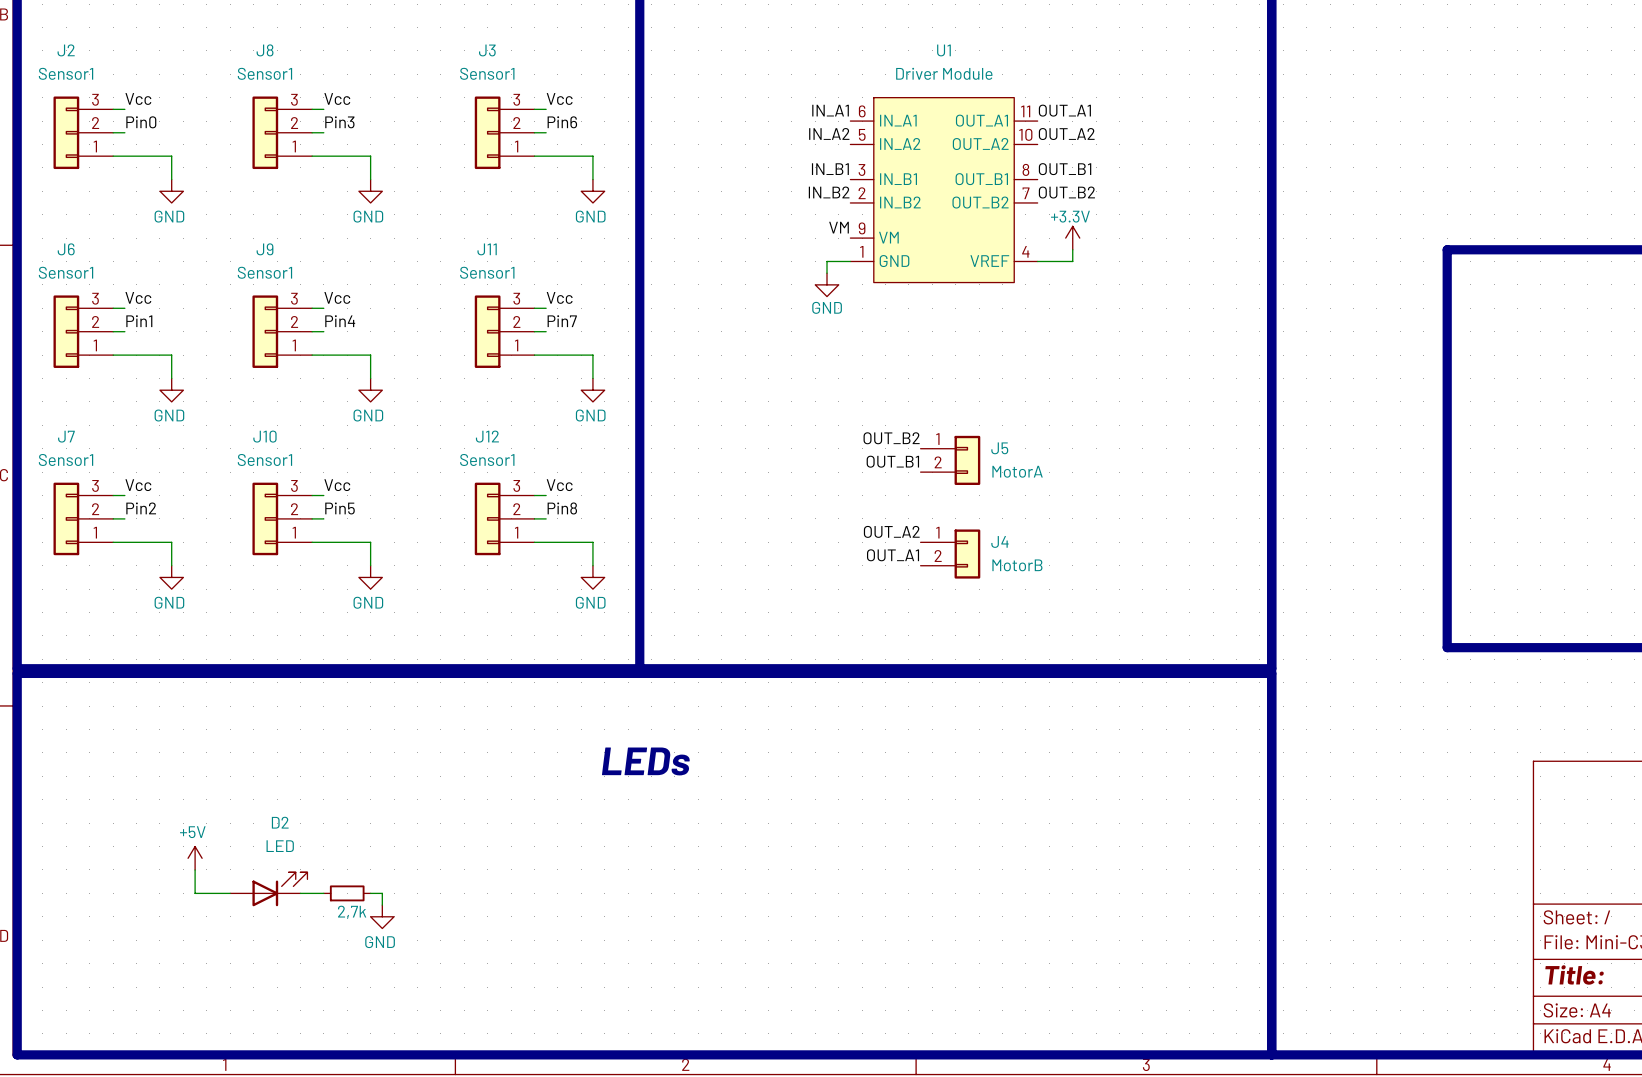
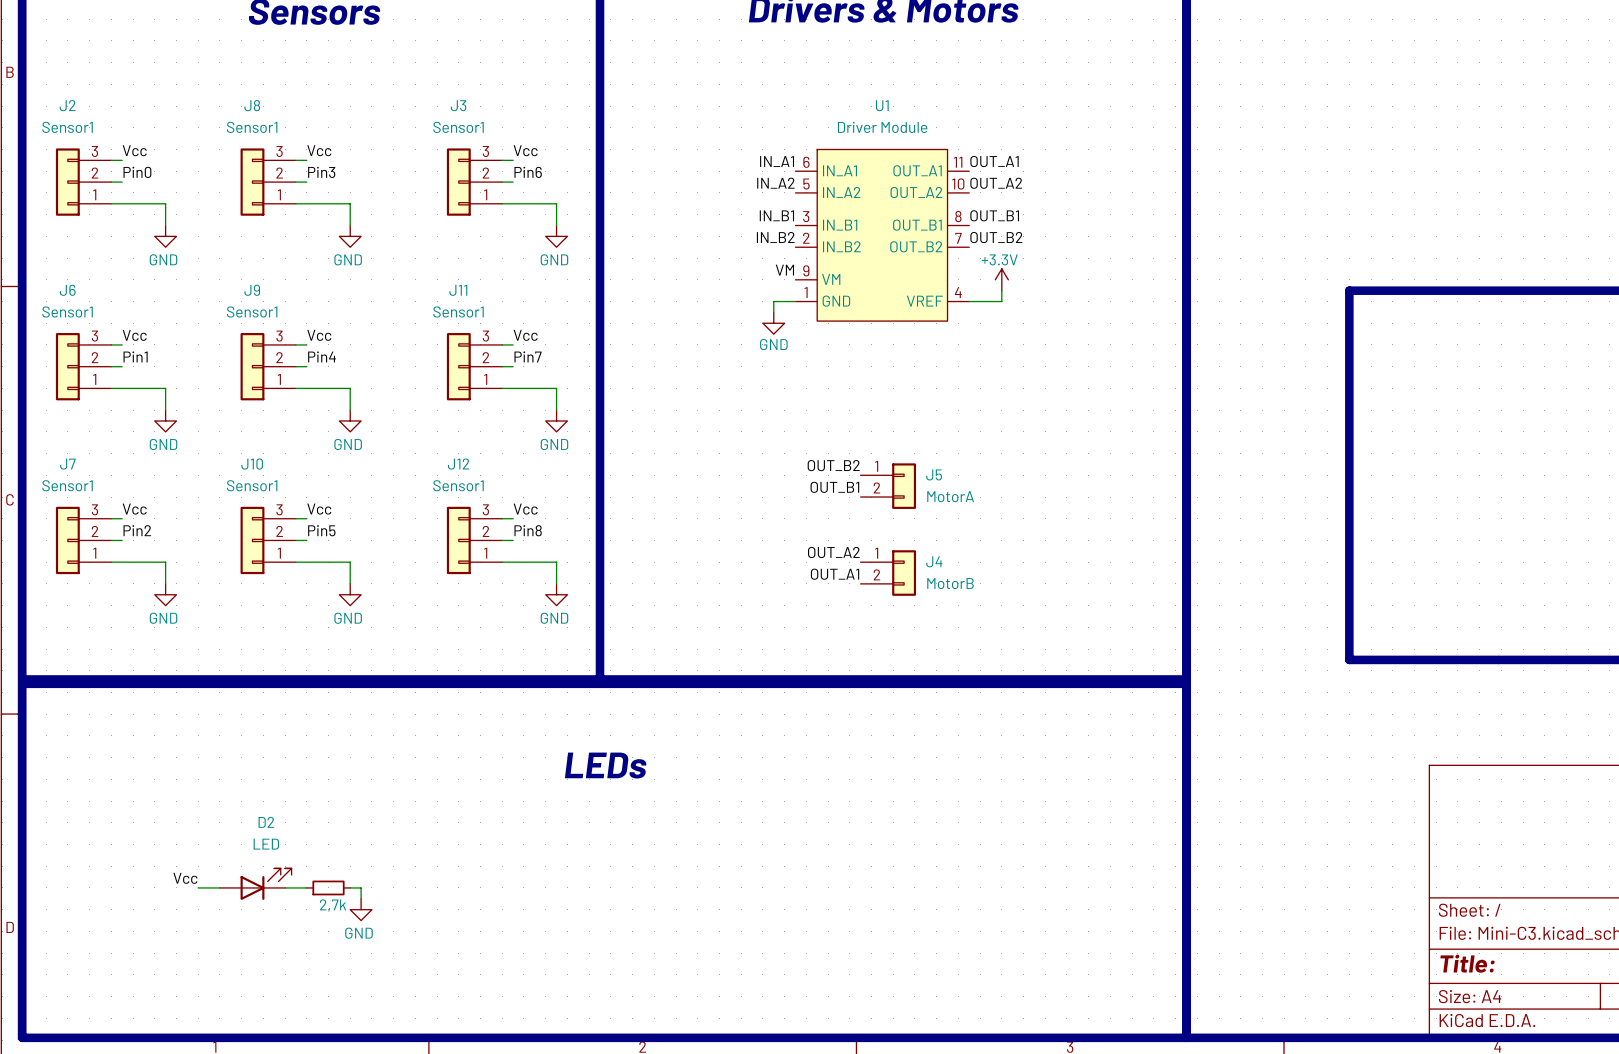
power symbol: +5V (195, 858) -> none
wire: (195, 869) (195, 893) (206, 893) -> none
label: none -> Vcc (185, 878)

